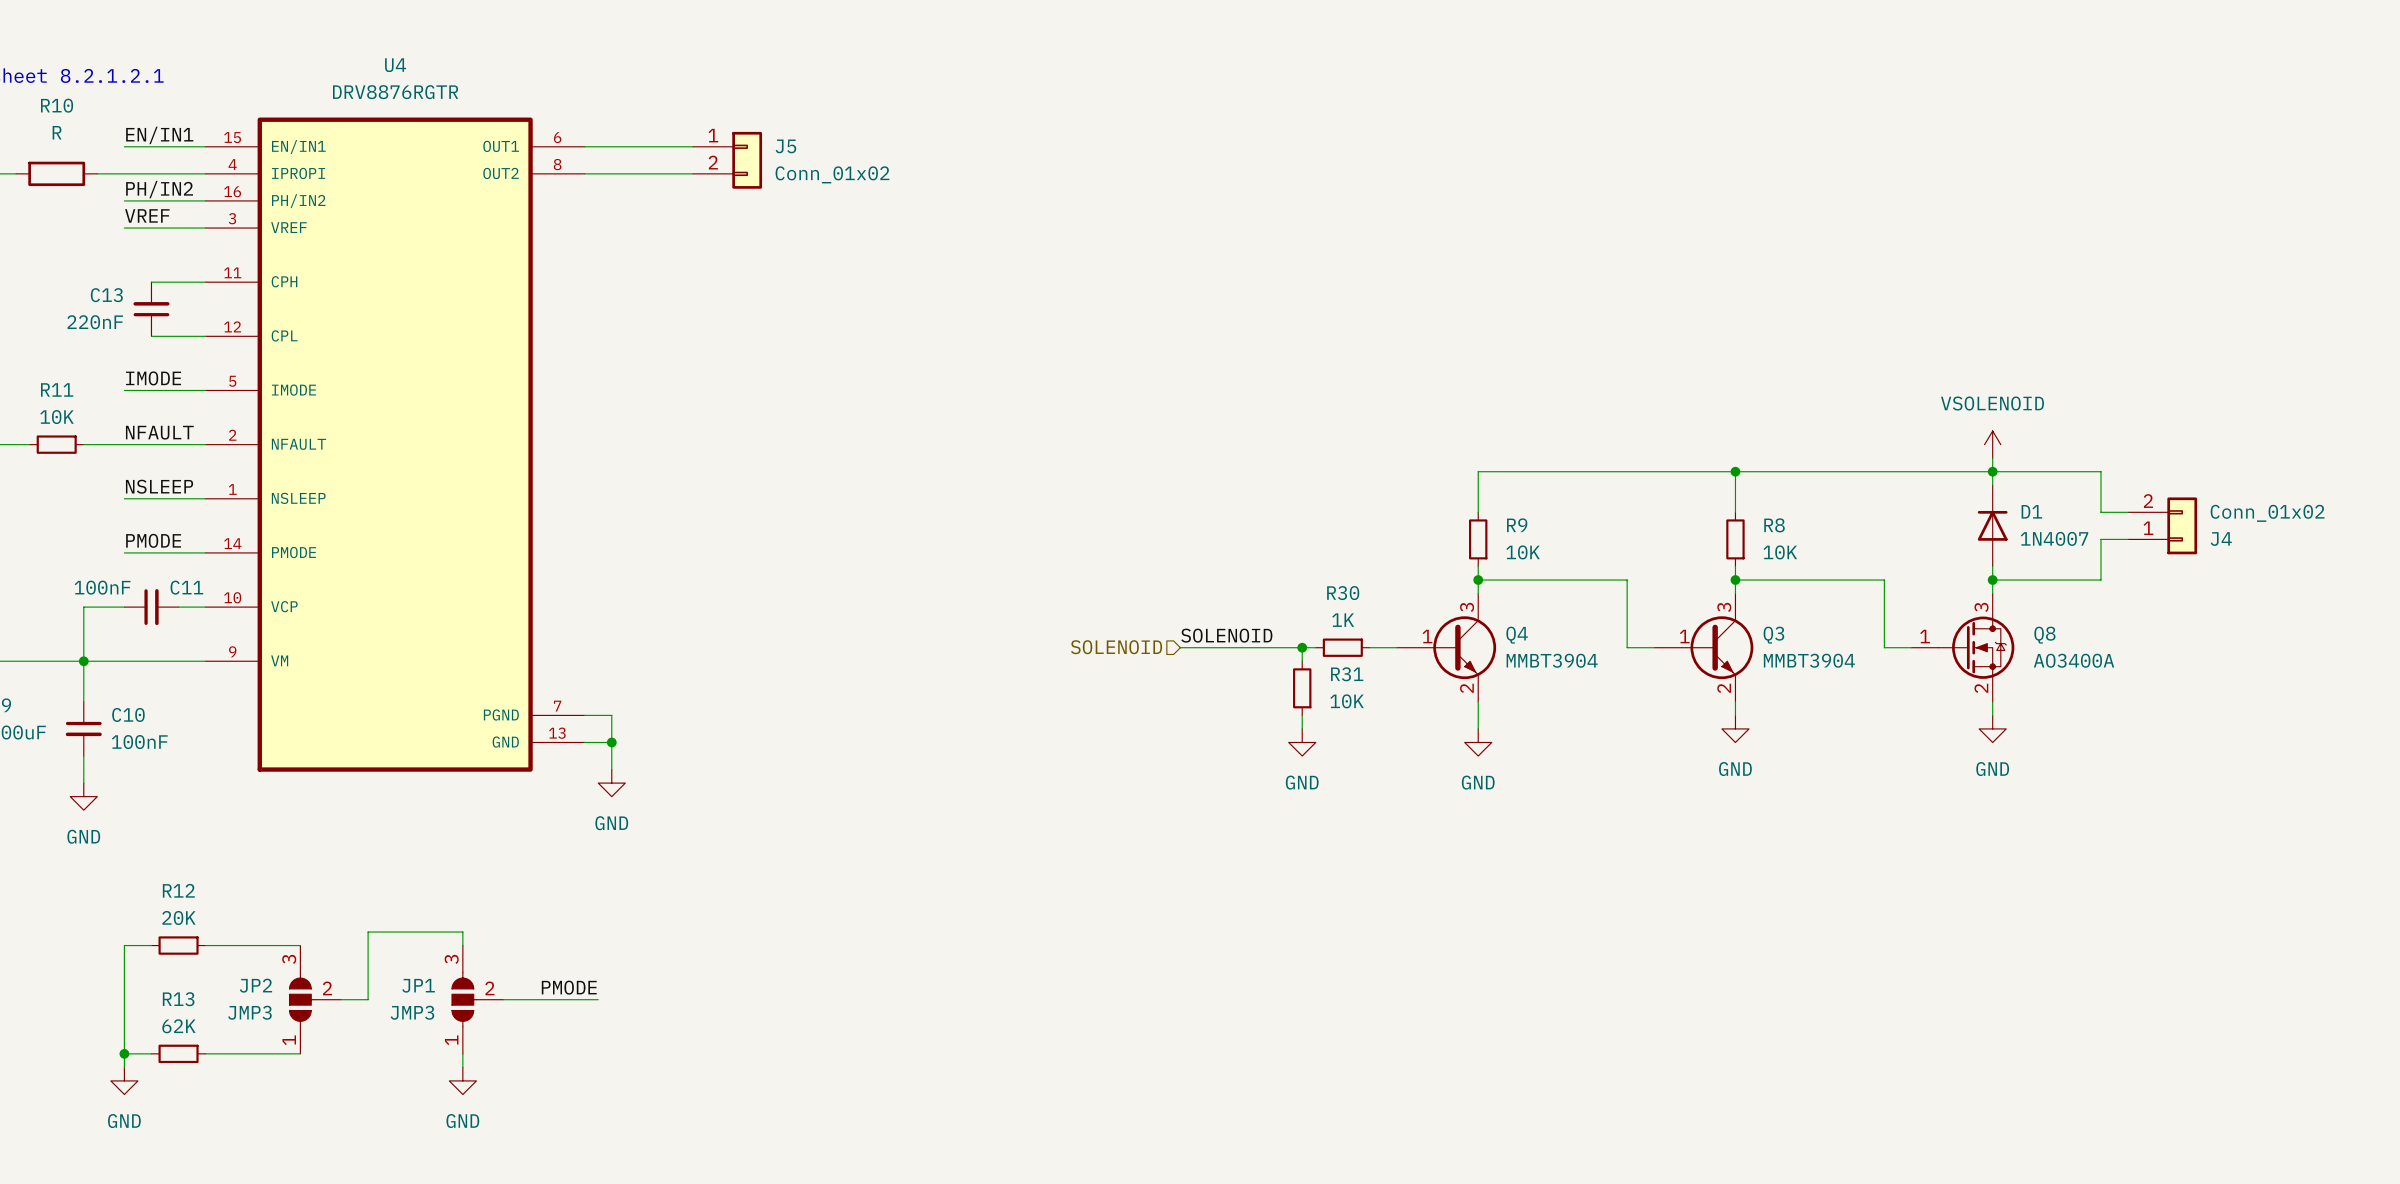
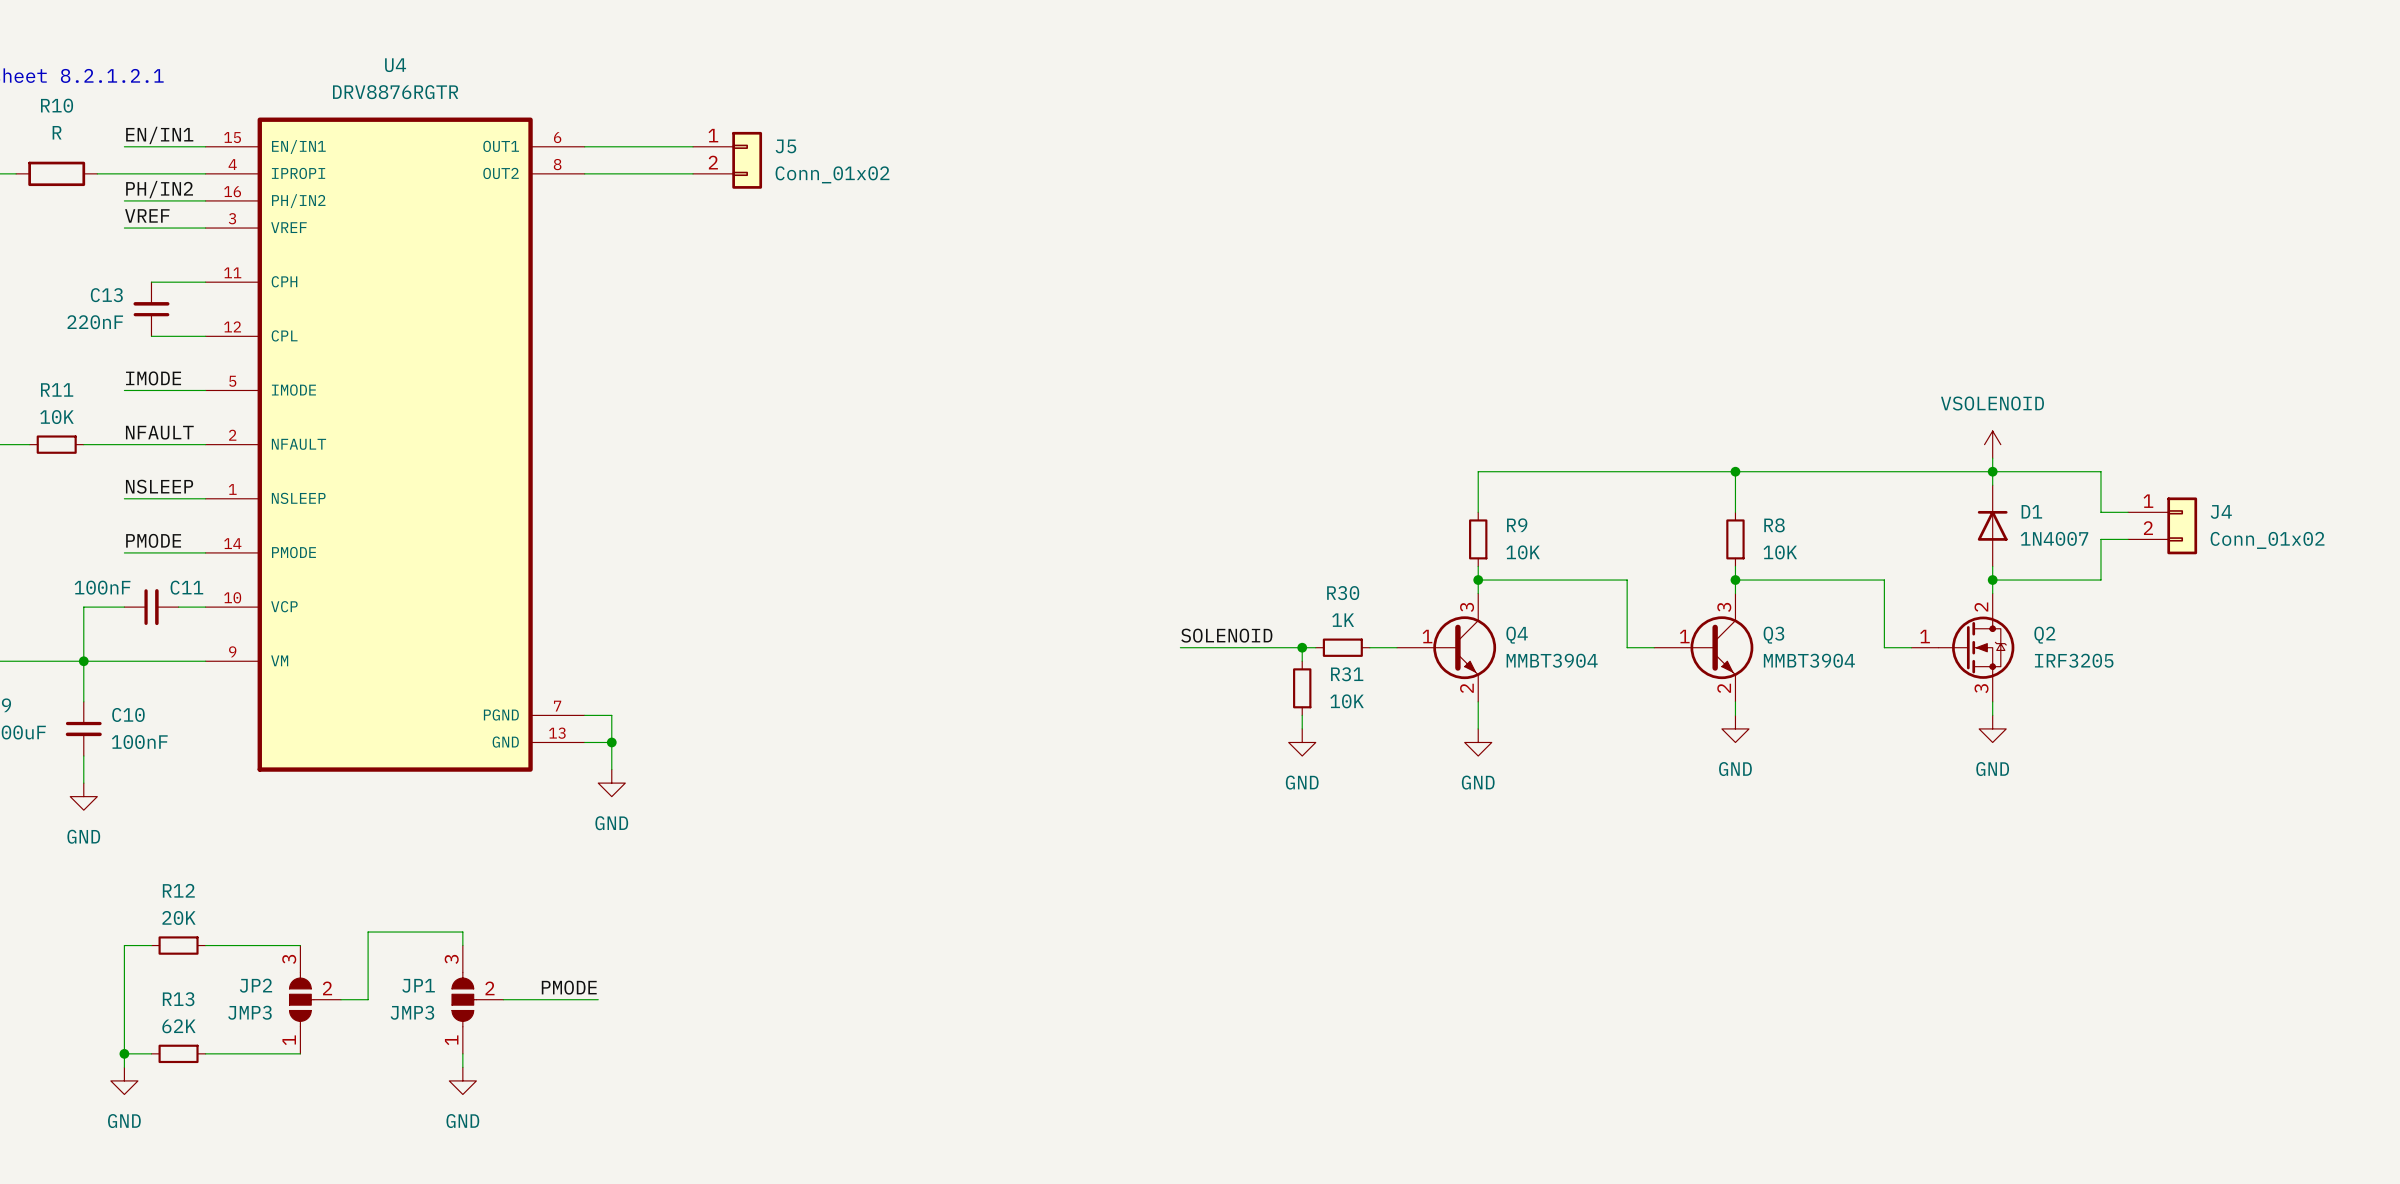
J4 flip: as is (2182, 525) -> up-down (2182, 525)
Q8 pin number: 3 (1981, 607) -> 2 (1981, 607)
Q8 name: Q8 (2044, 635) -> Q2 (2044, 635)
hierarchical label: SOLENOID (1116, 647) -> none
Q8 value: AO3400A (2074, 660) -> IRF3205 (2074, 660)
Q8 pin number: 2 (1981, 688) -> 3 (1981, 688)

